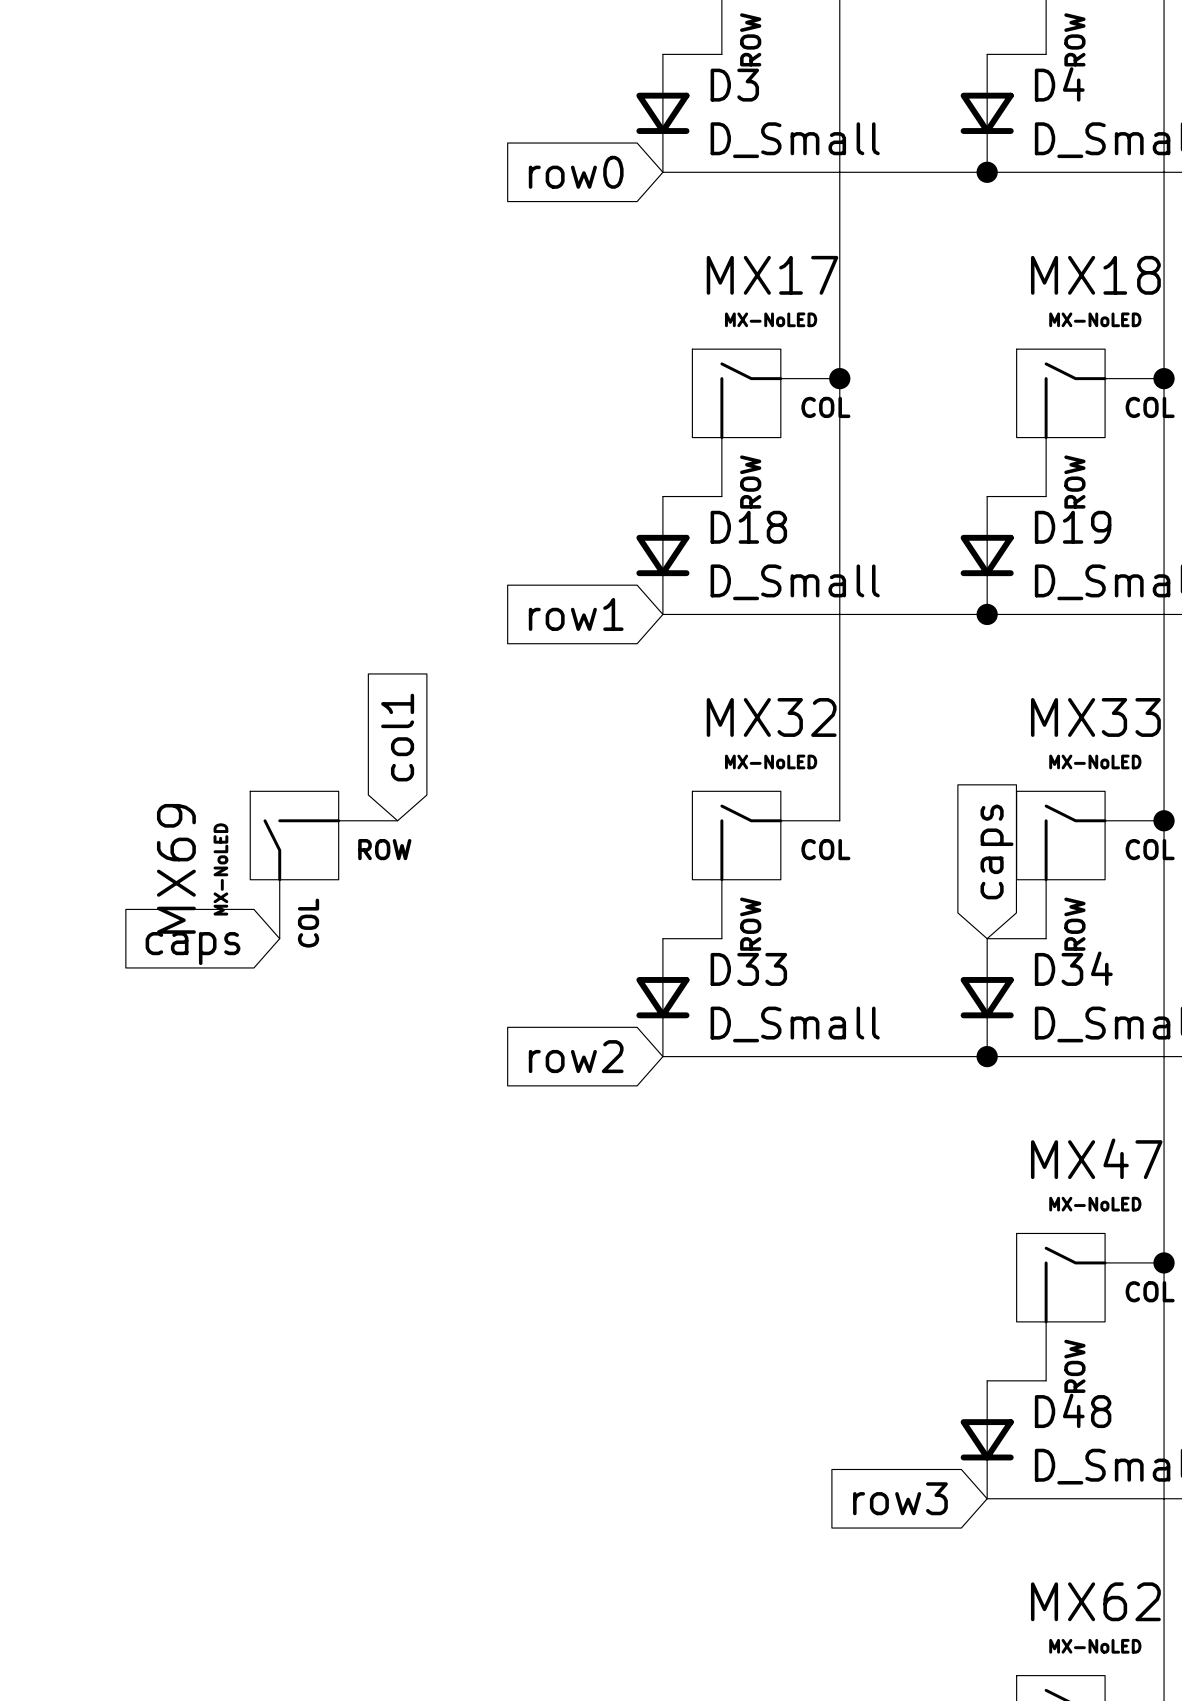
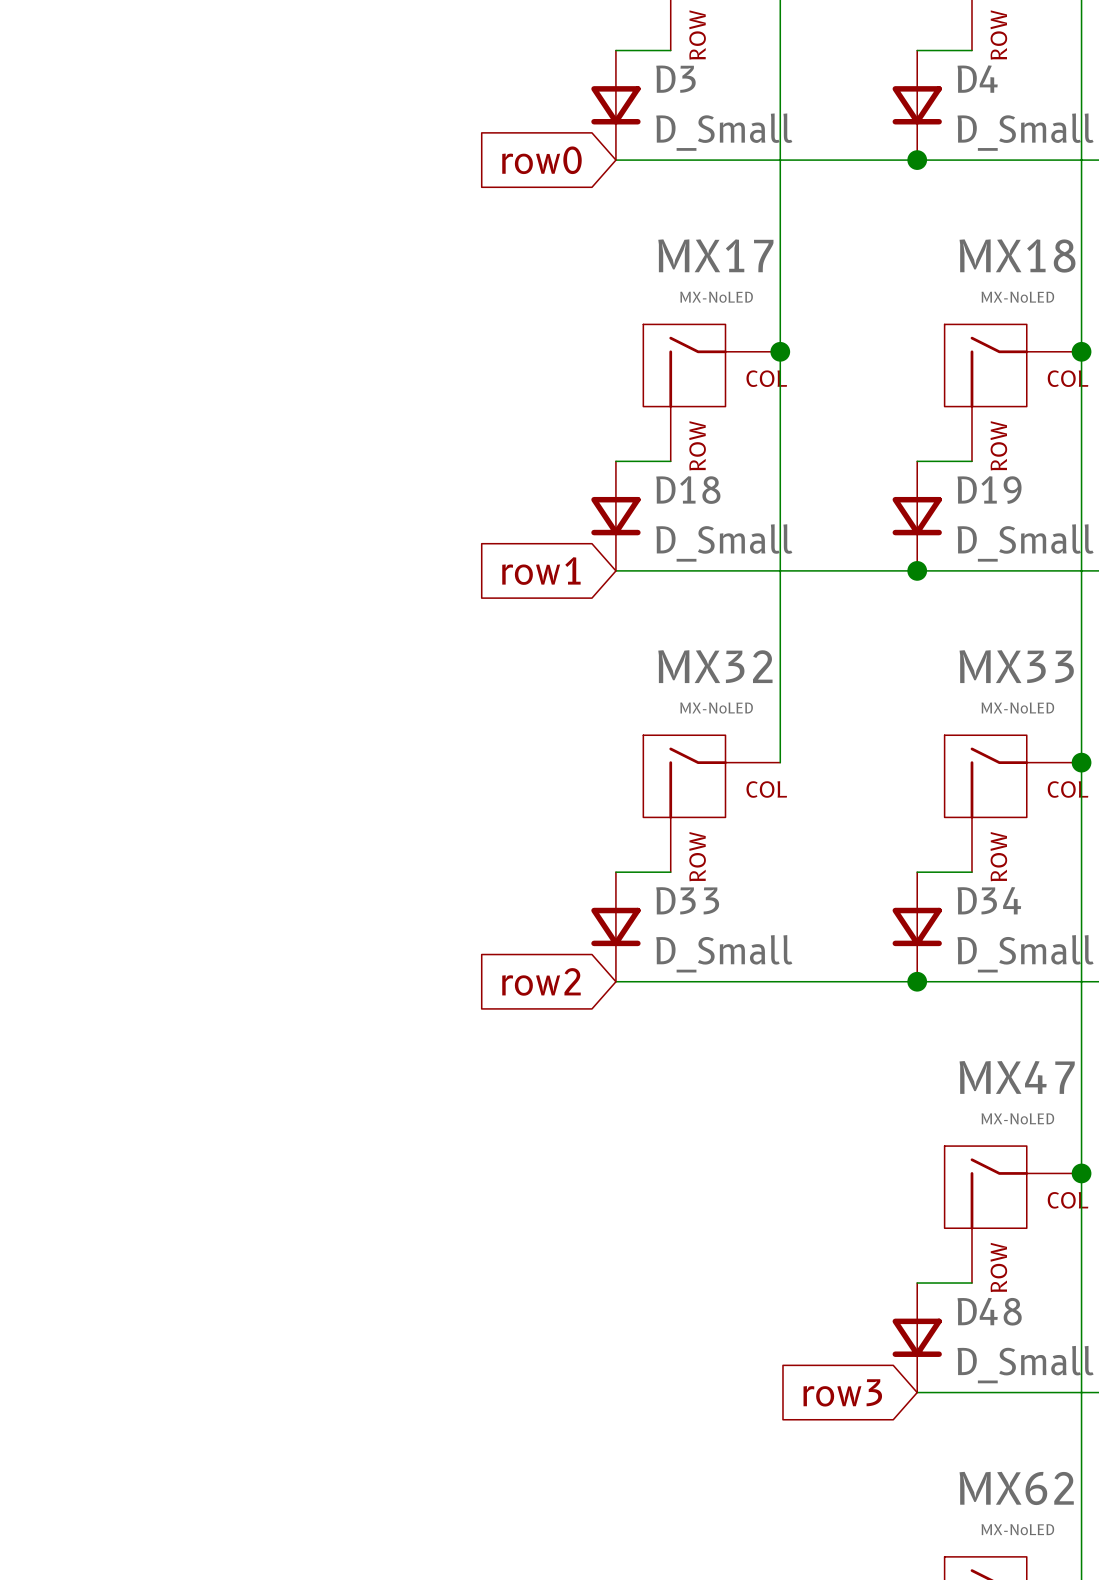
global label: col1 (397, 737) -> none
global label: caps (996, 851) -> none
MX69: MX-NoLED (323, 865) -> none
global label: caps (192, 948) -> none

